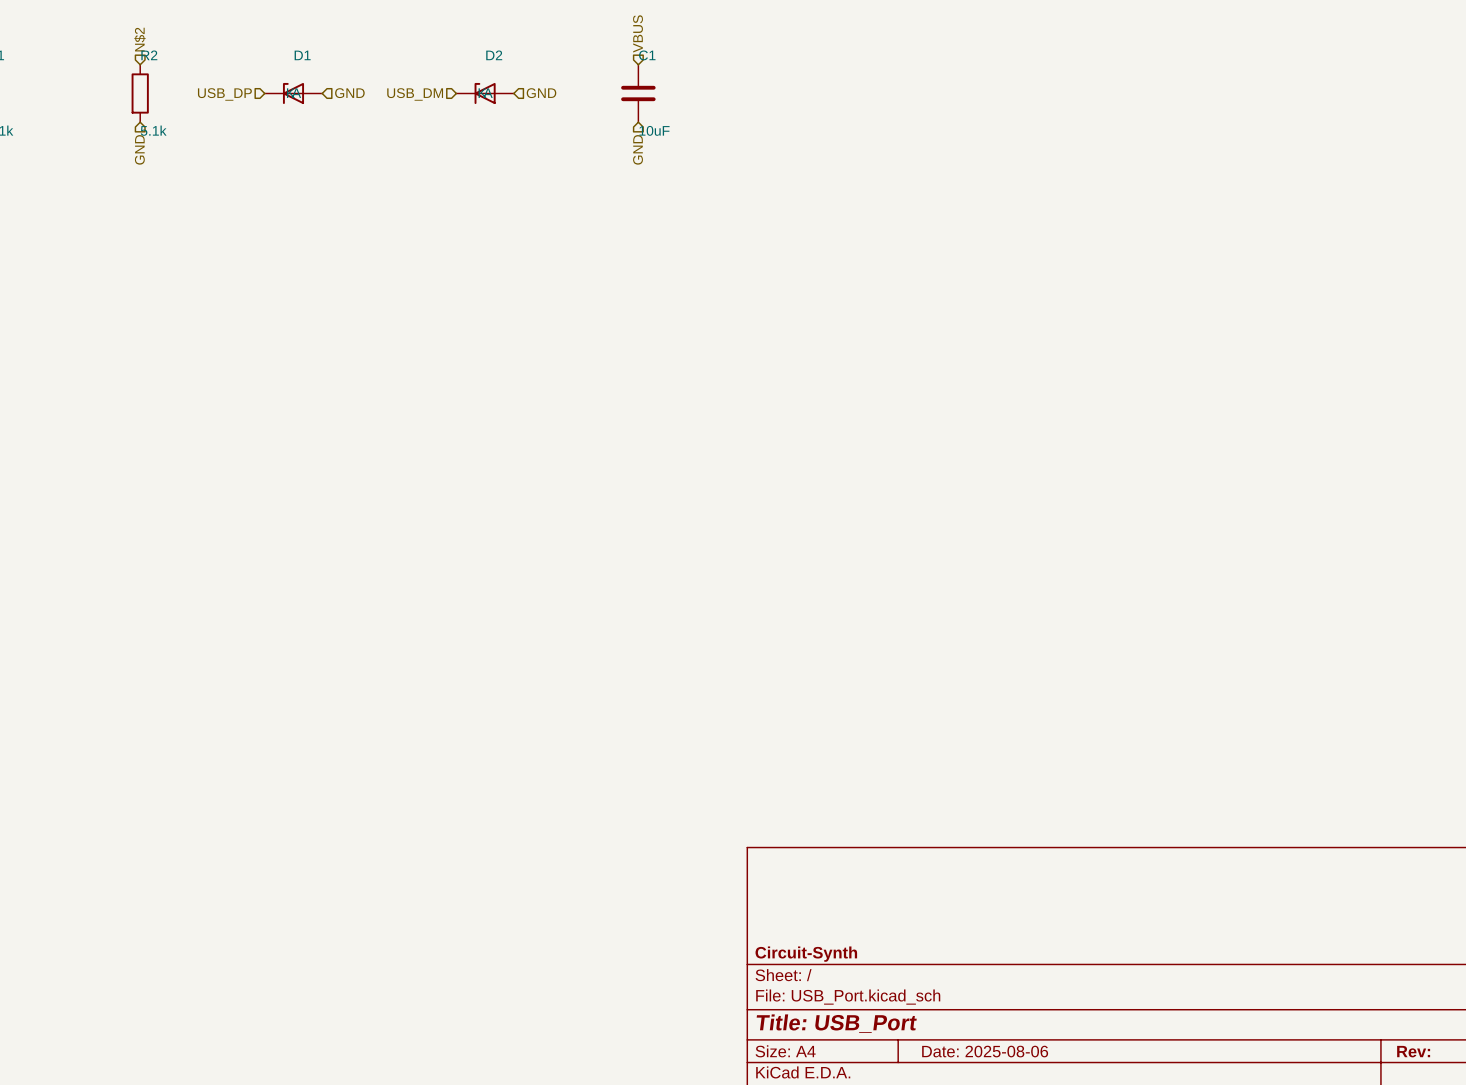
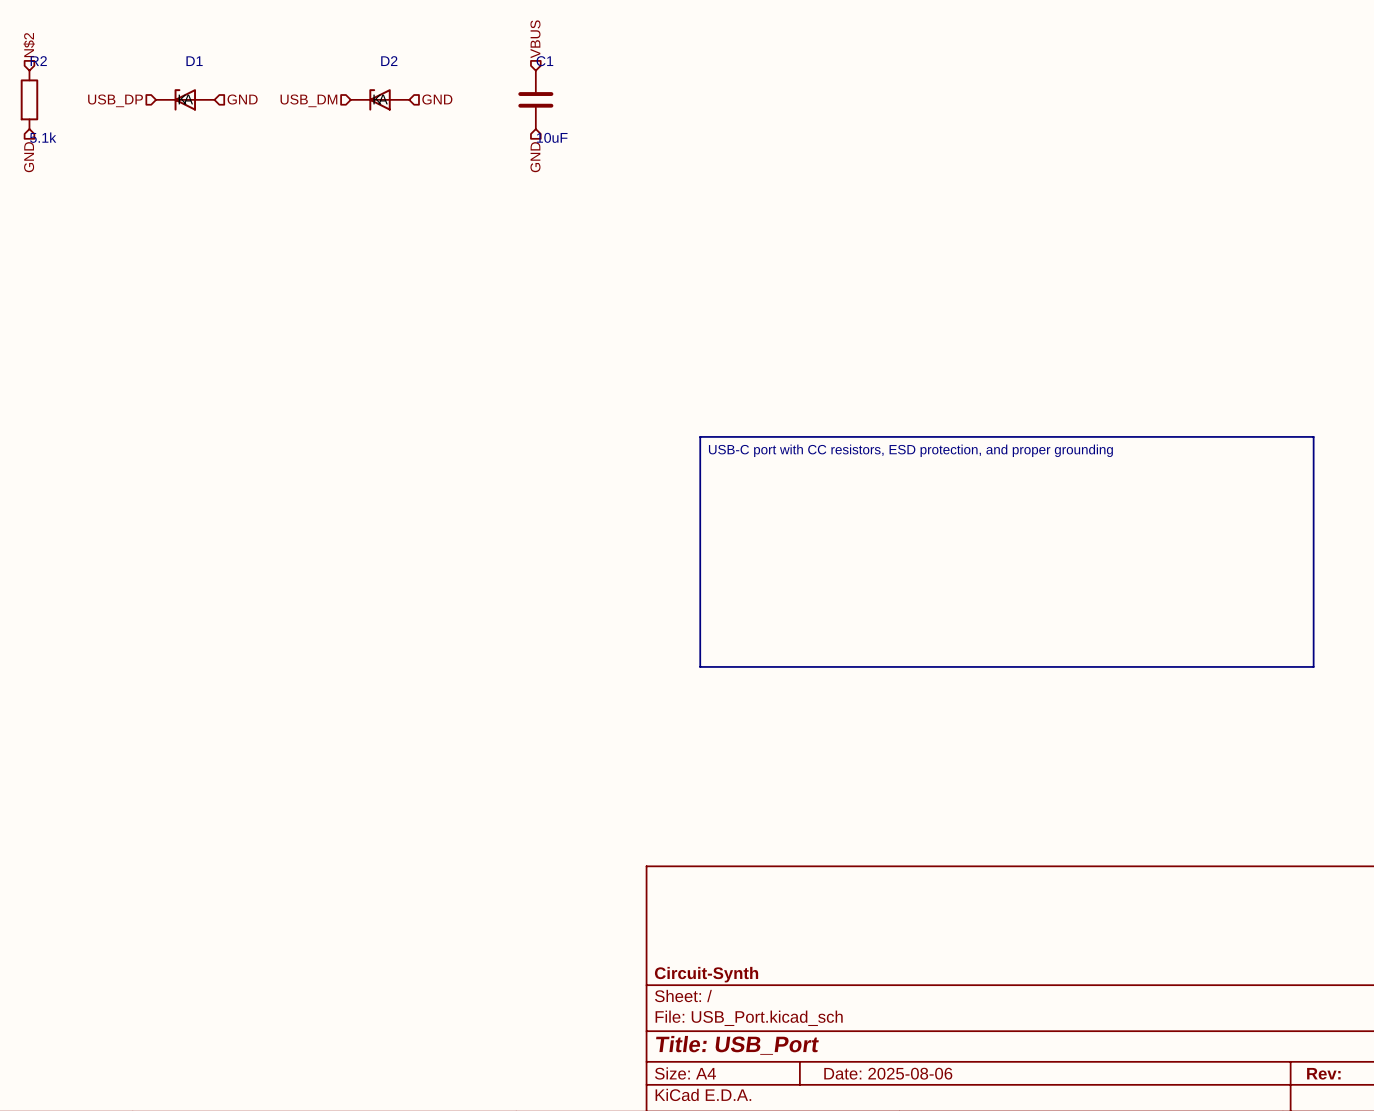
line: none -> (700, 436) (1313, 436) (1313, 666) (700, 666) (700, 436)
text: none -> USB-C port with CC resistors, ESD protection, and proper grounding (910, 450)

